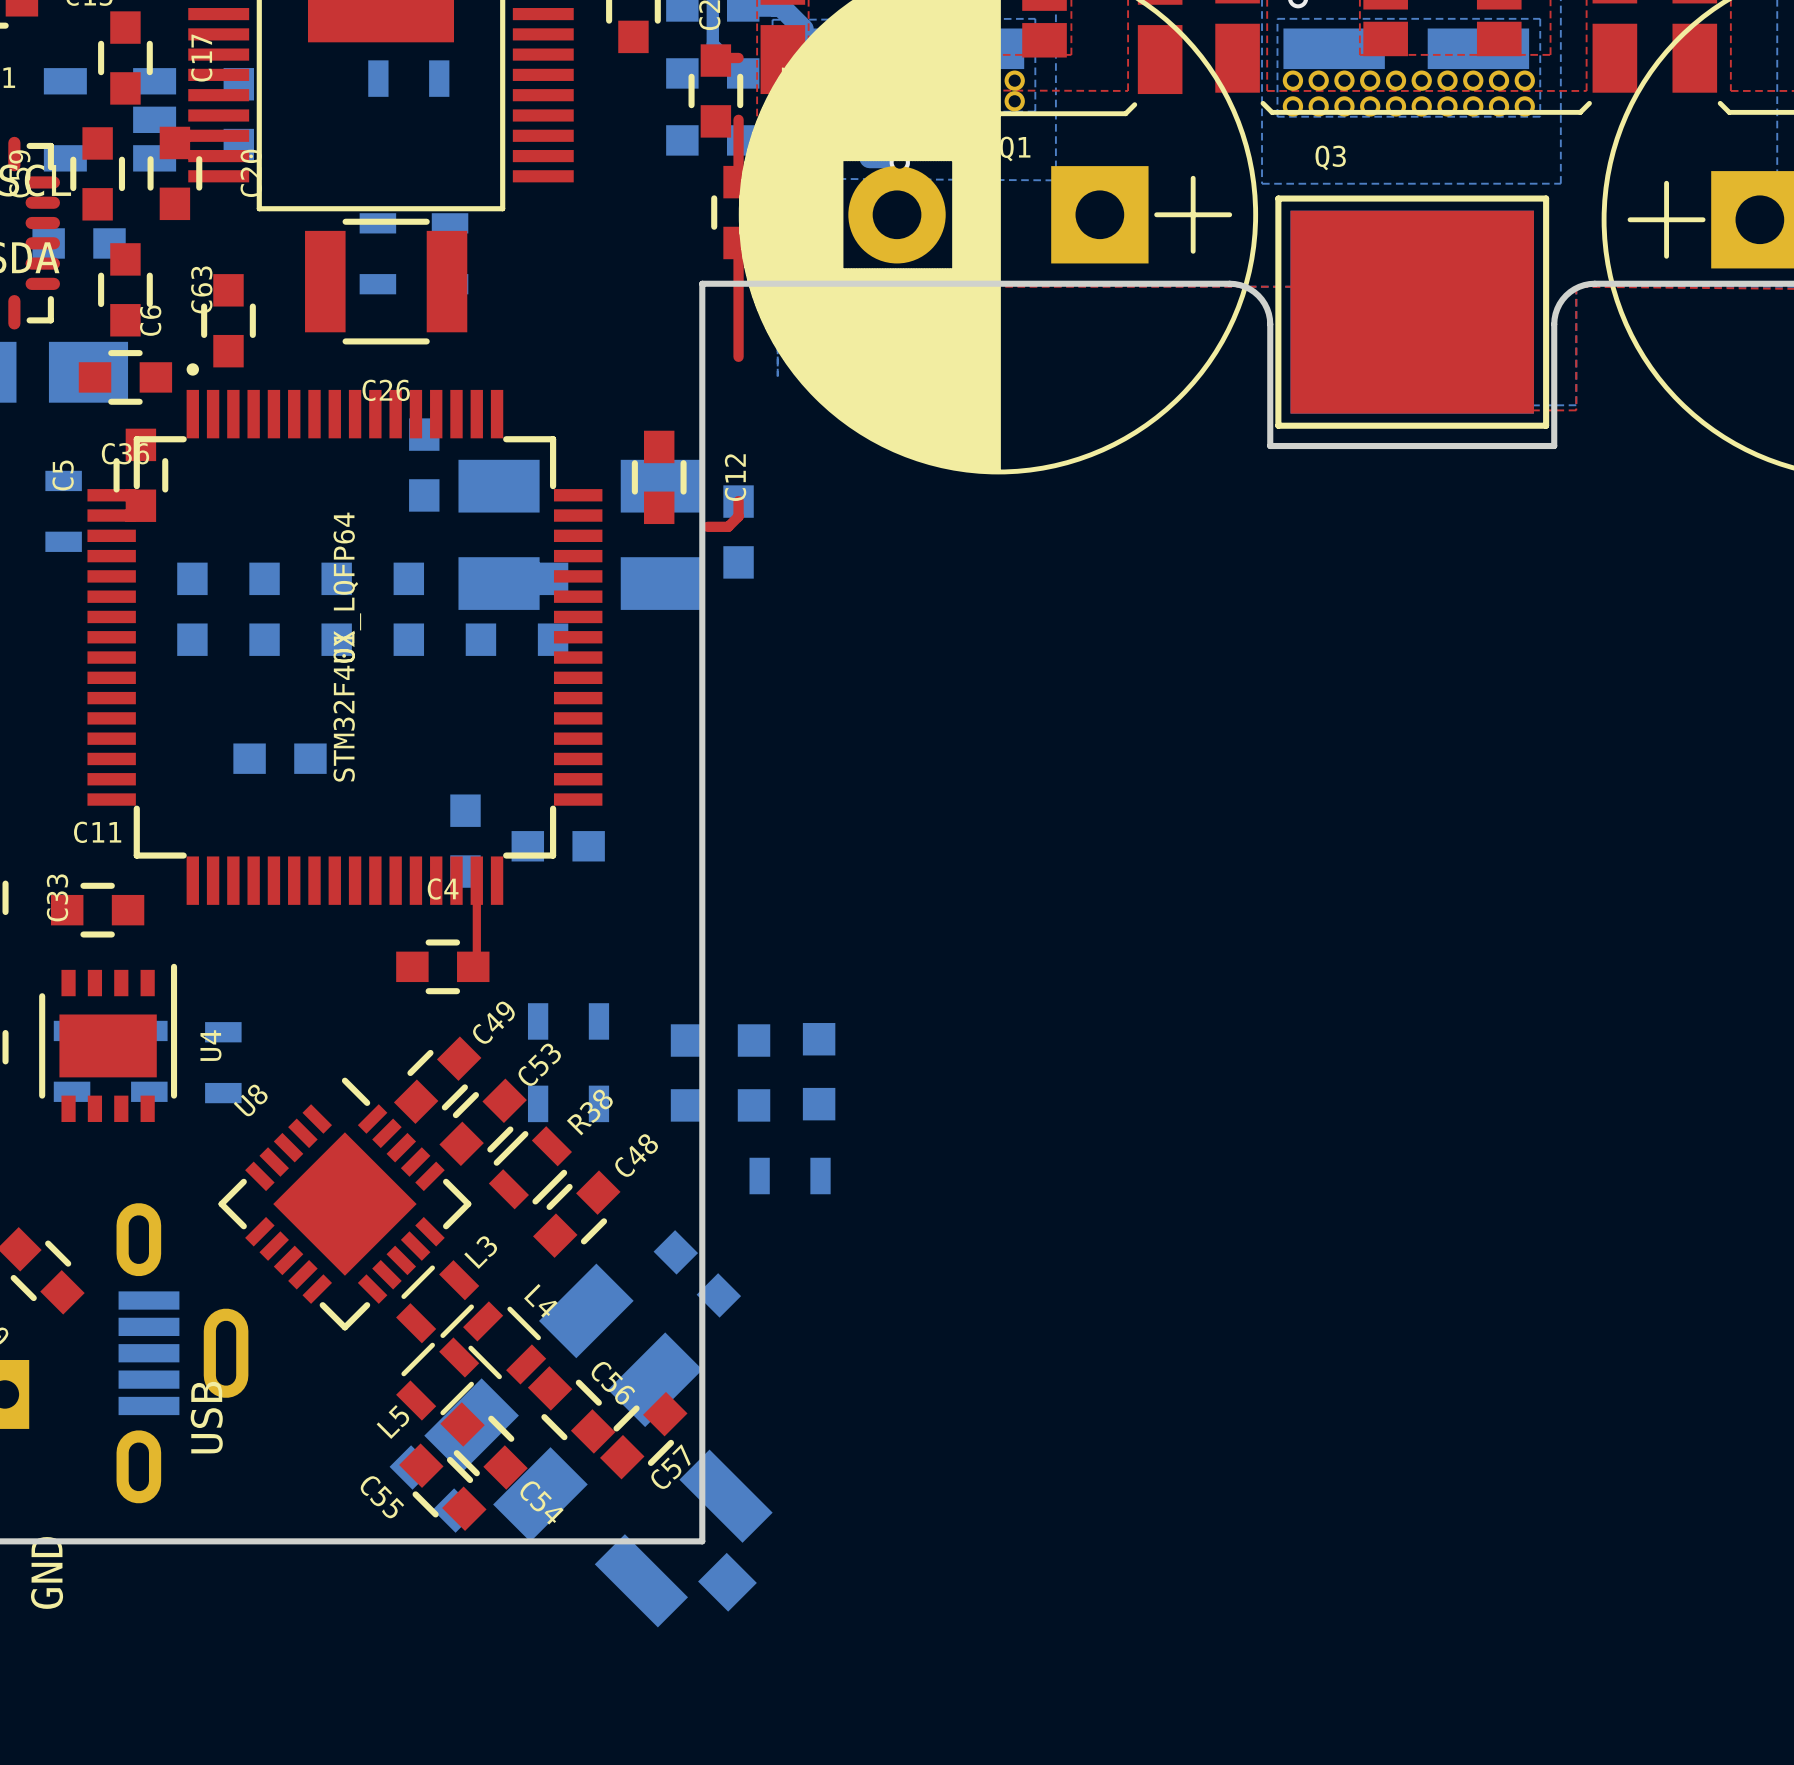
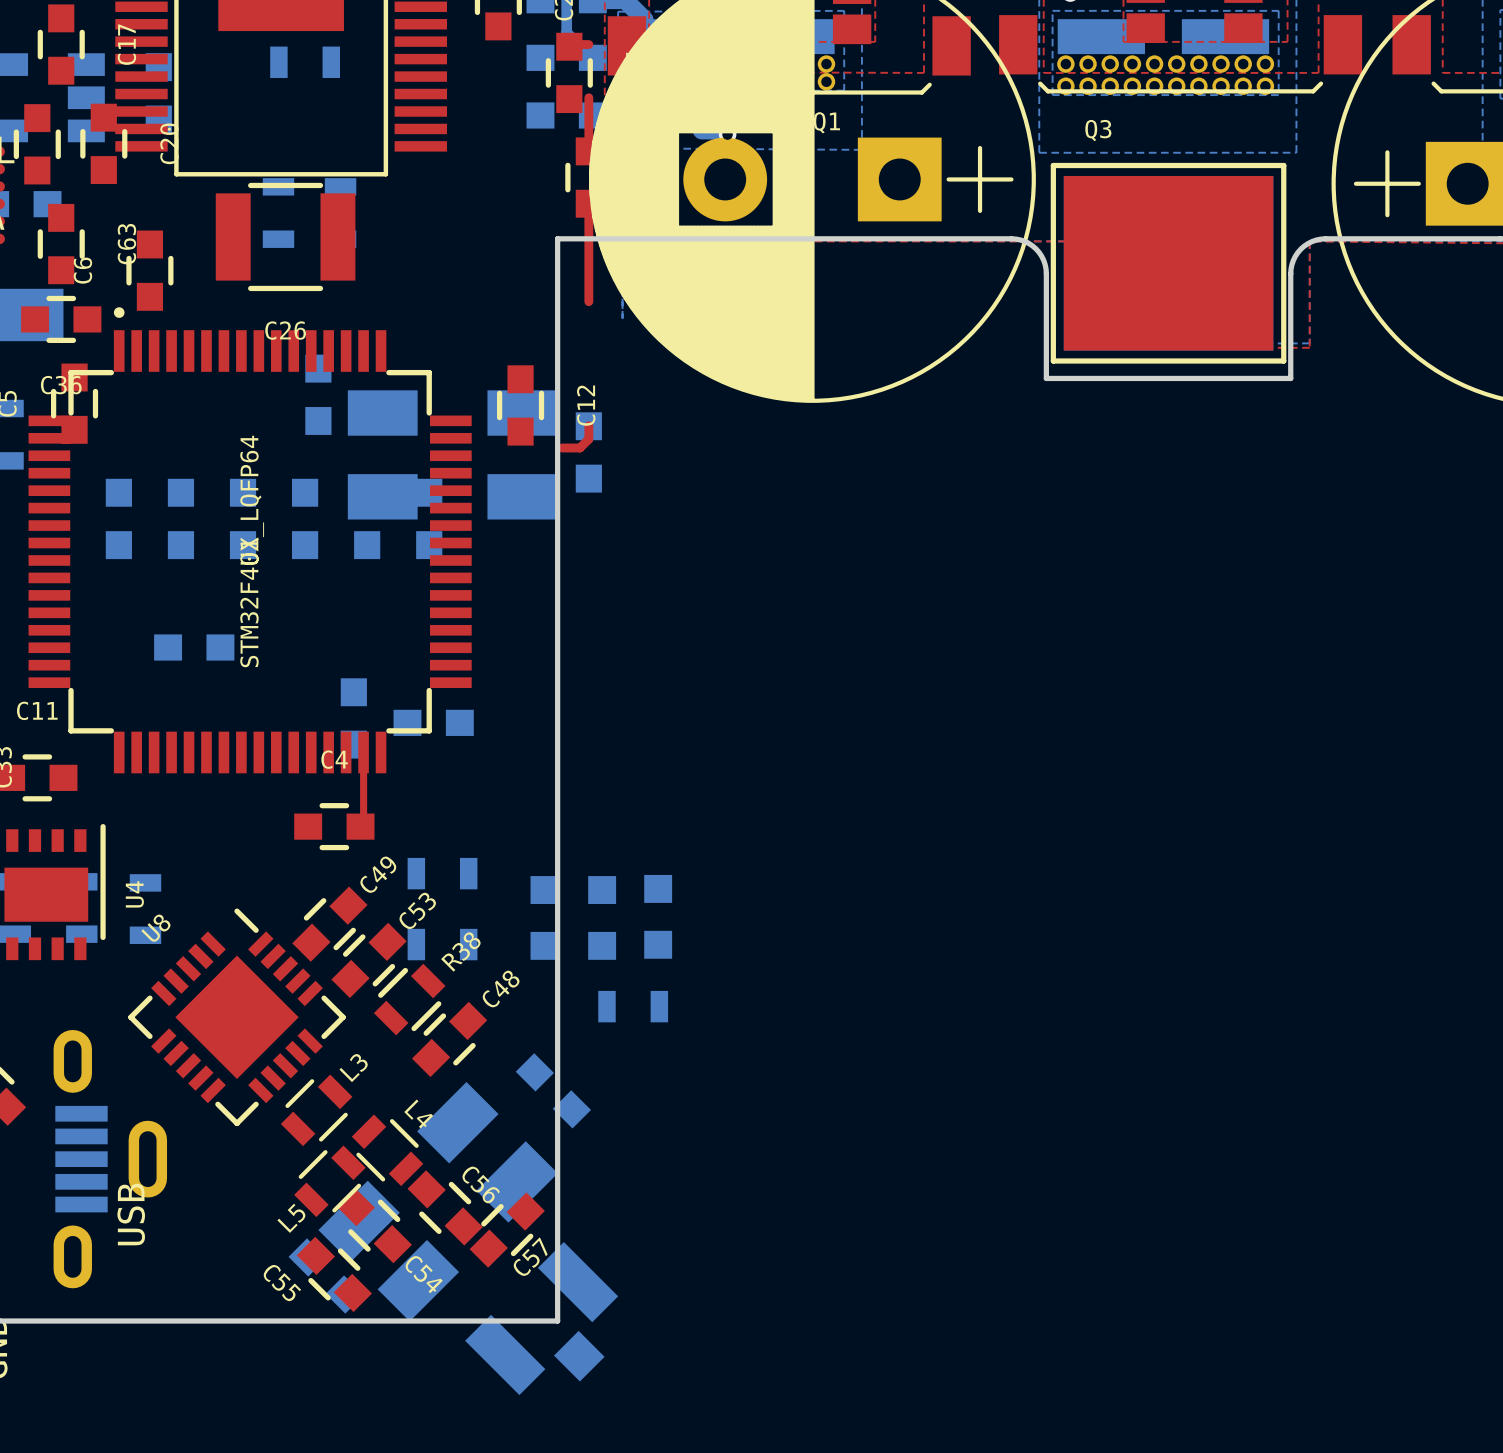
U8 position: (344, 1204) -> (236, 1017)
L3 position: (437, 1301) -> (316, 1110)
C54 position: (484, 1445) -> (374, 1225)

